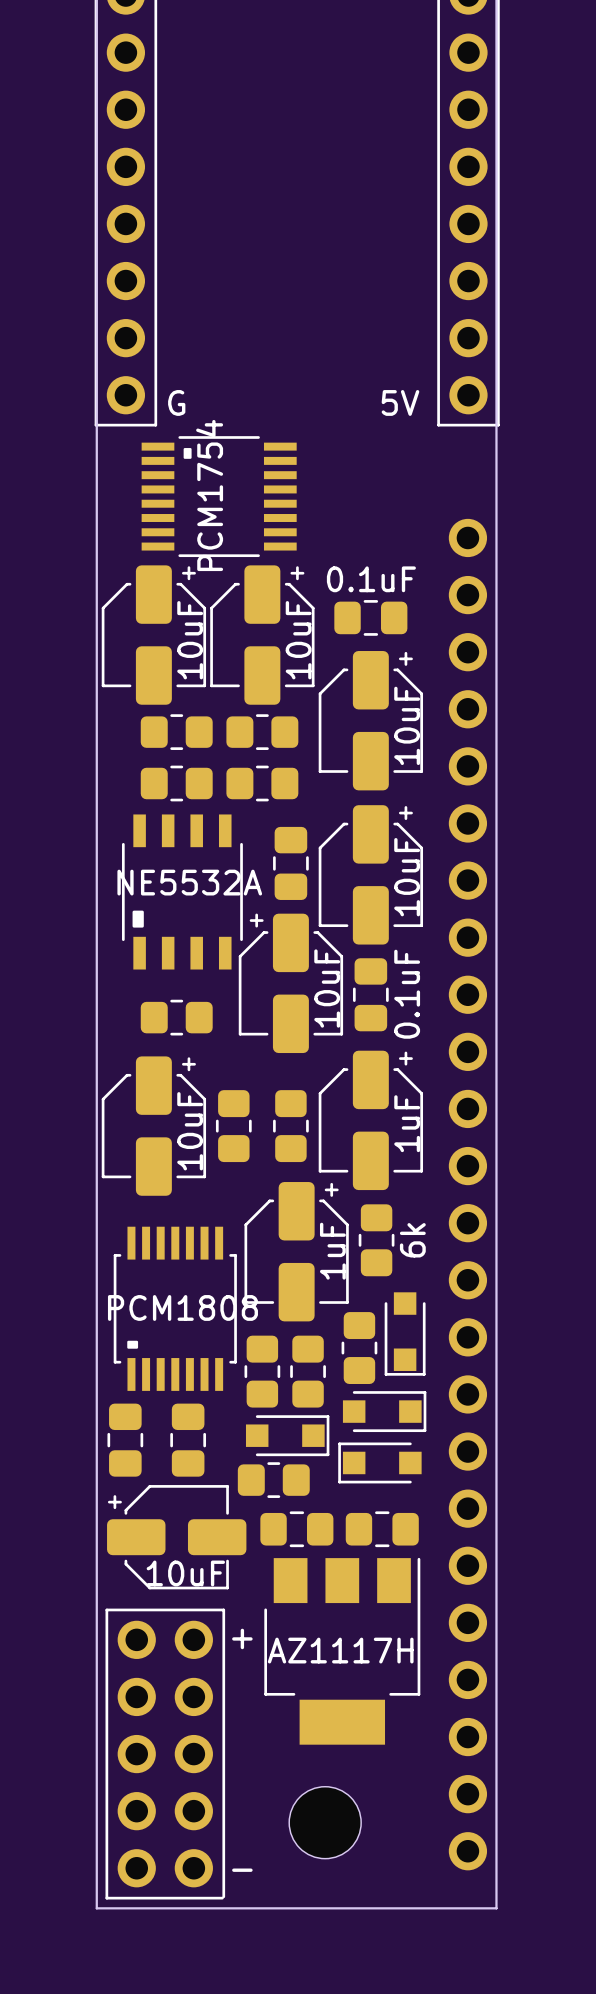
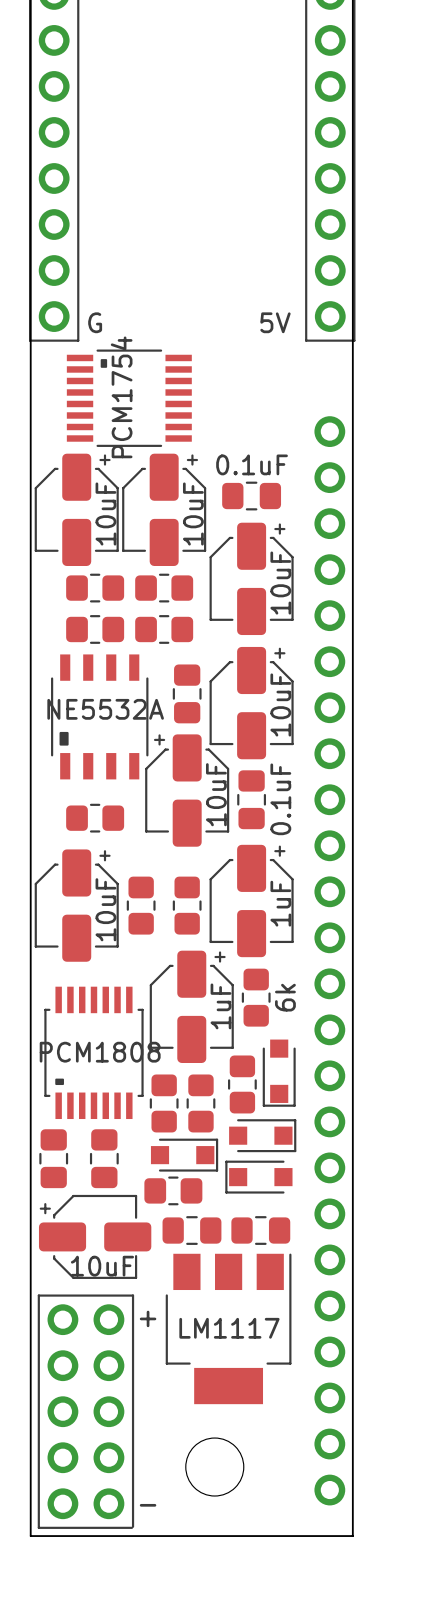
part text: AZ1117H (340, 1650) -> LM1117 (229, 1328)

